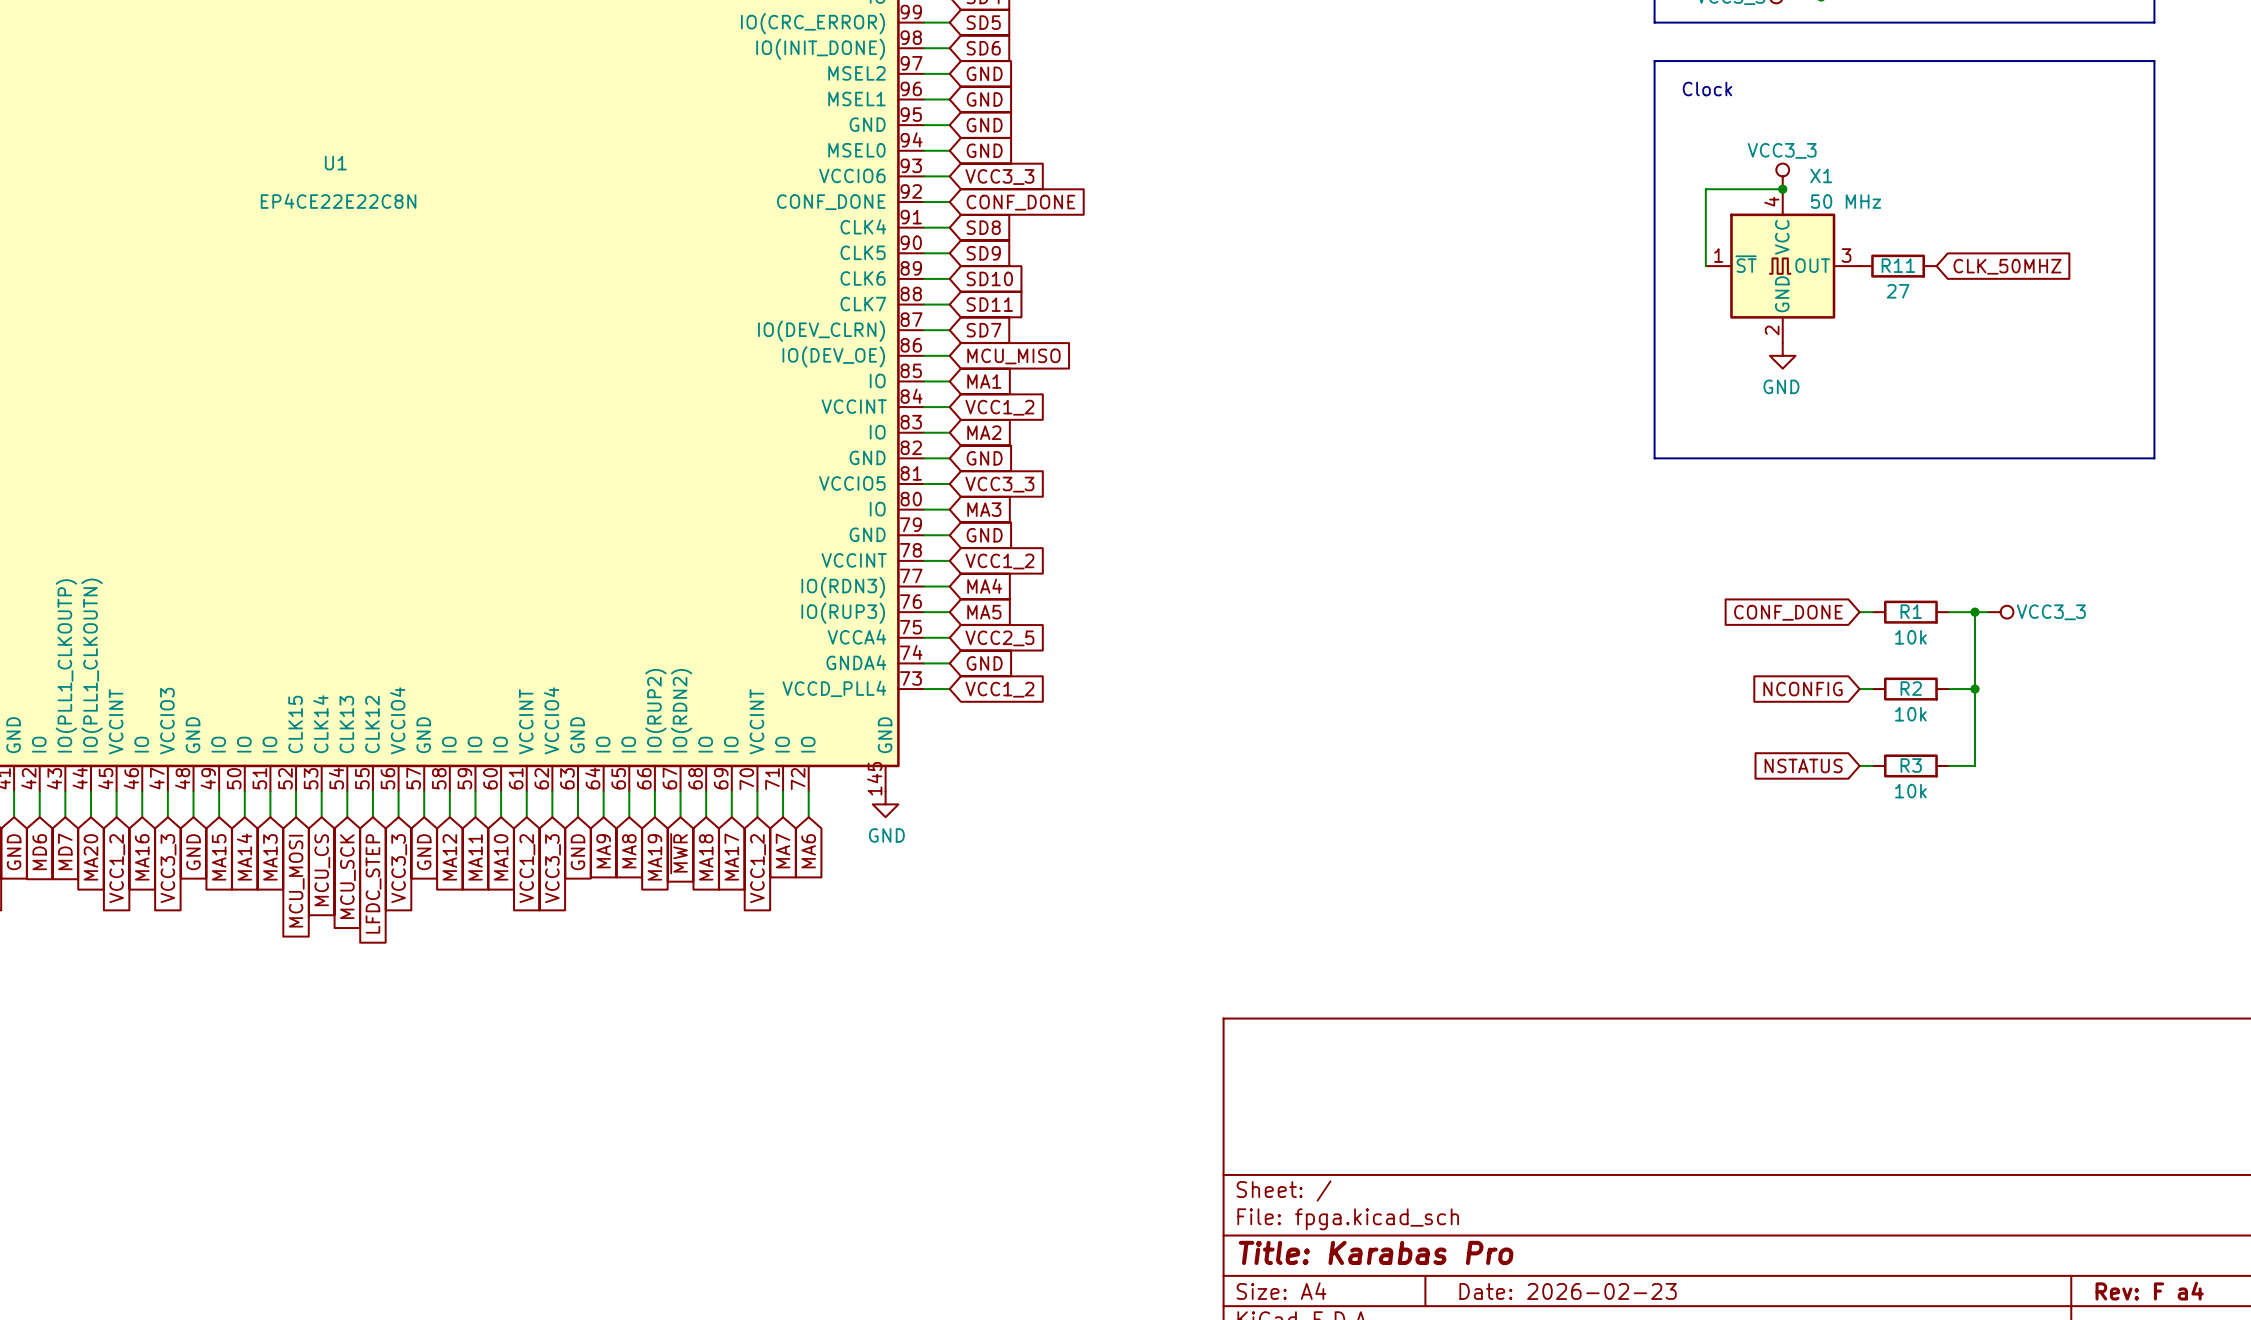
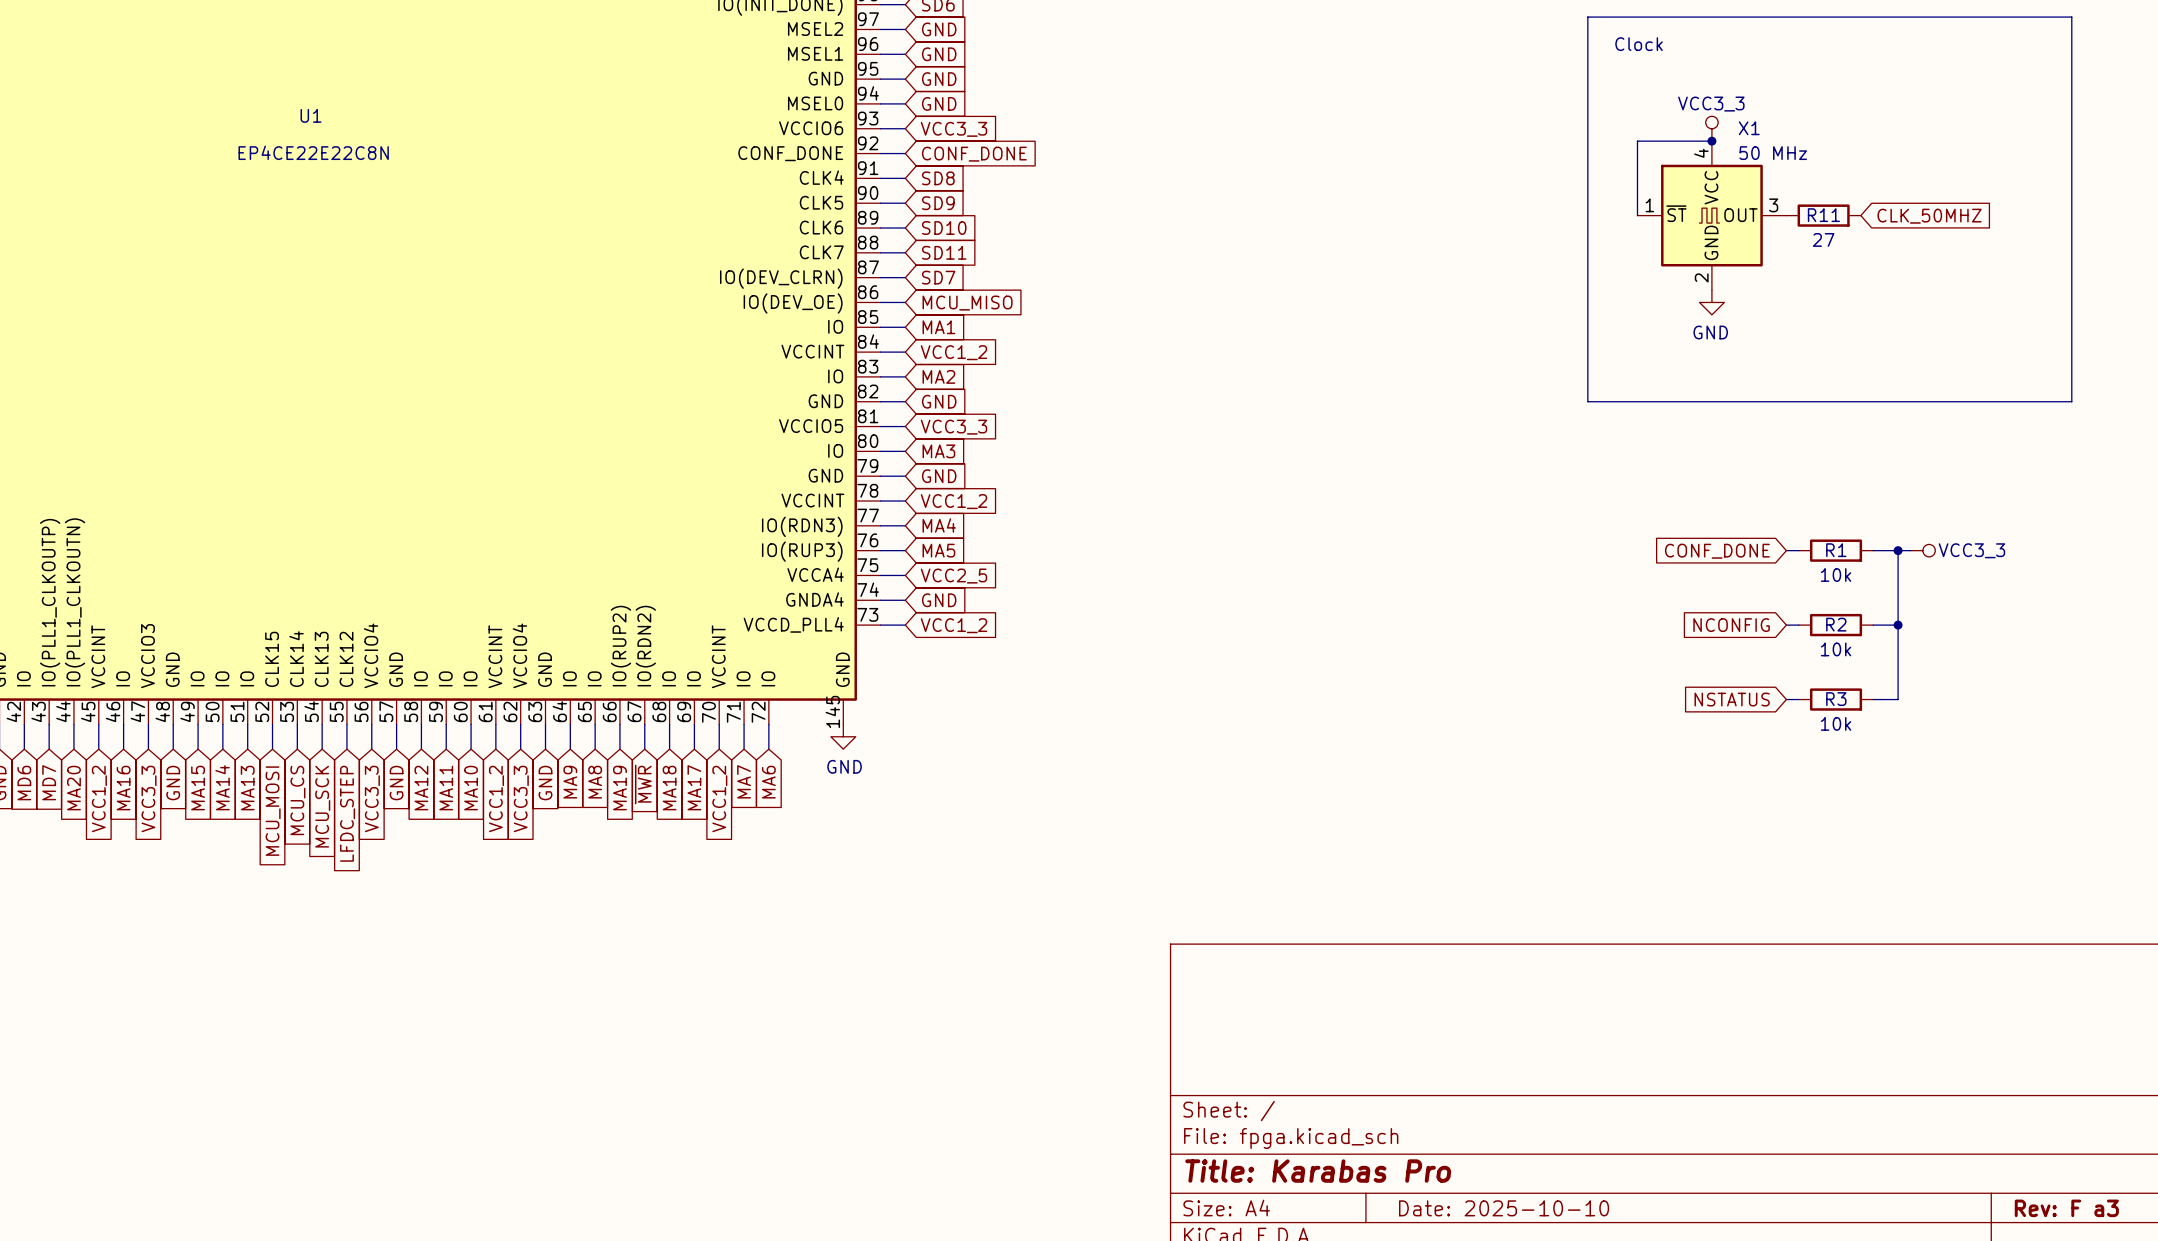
title block: Date: 2026-02-23 (1568, 1291) -> Date: 2025-10-10 (1504, 1208)
title block: Rev: F a4 (2149, 1291) -> Rev: F a3 (2066, 1208)

